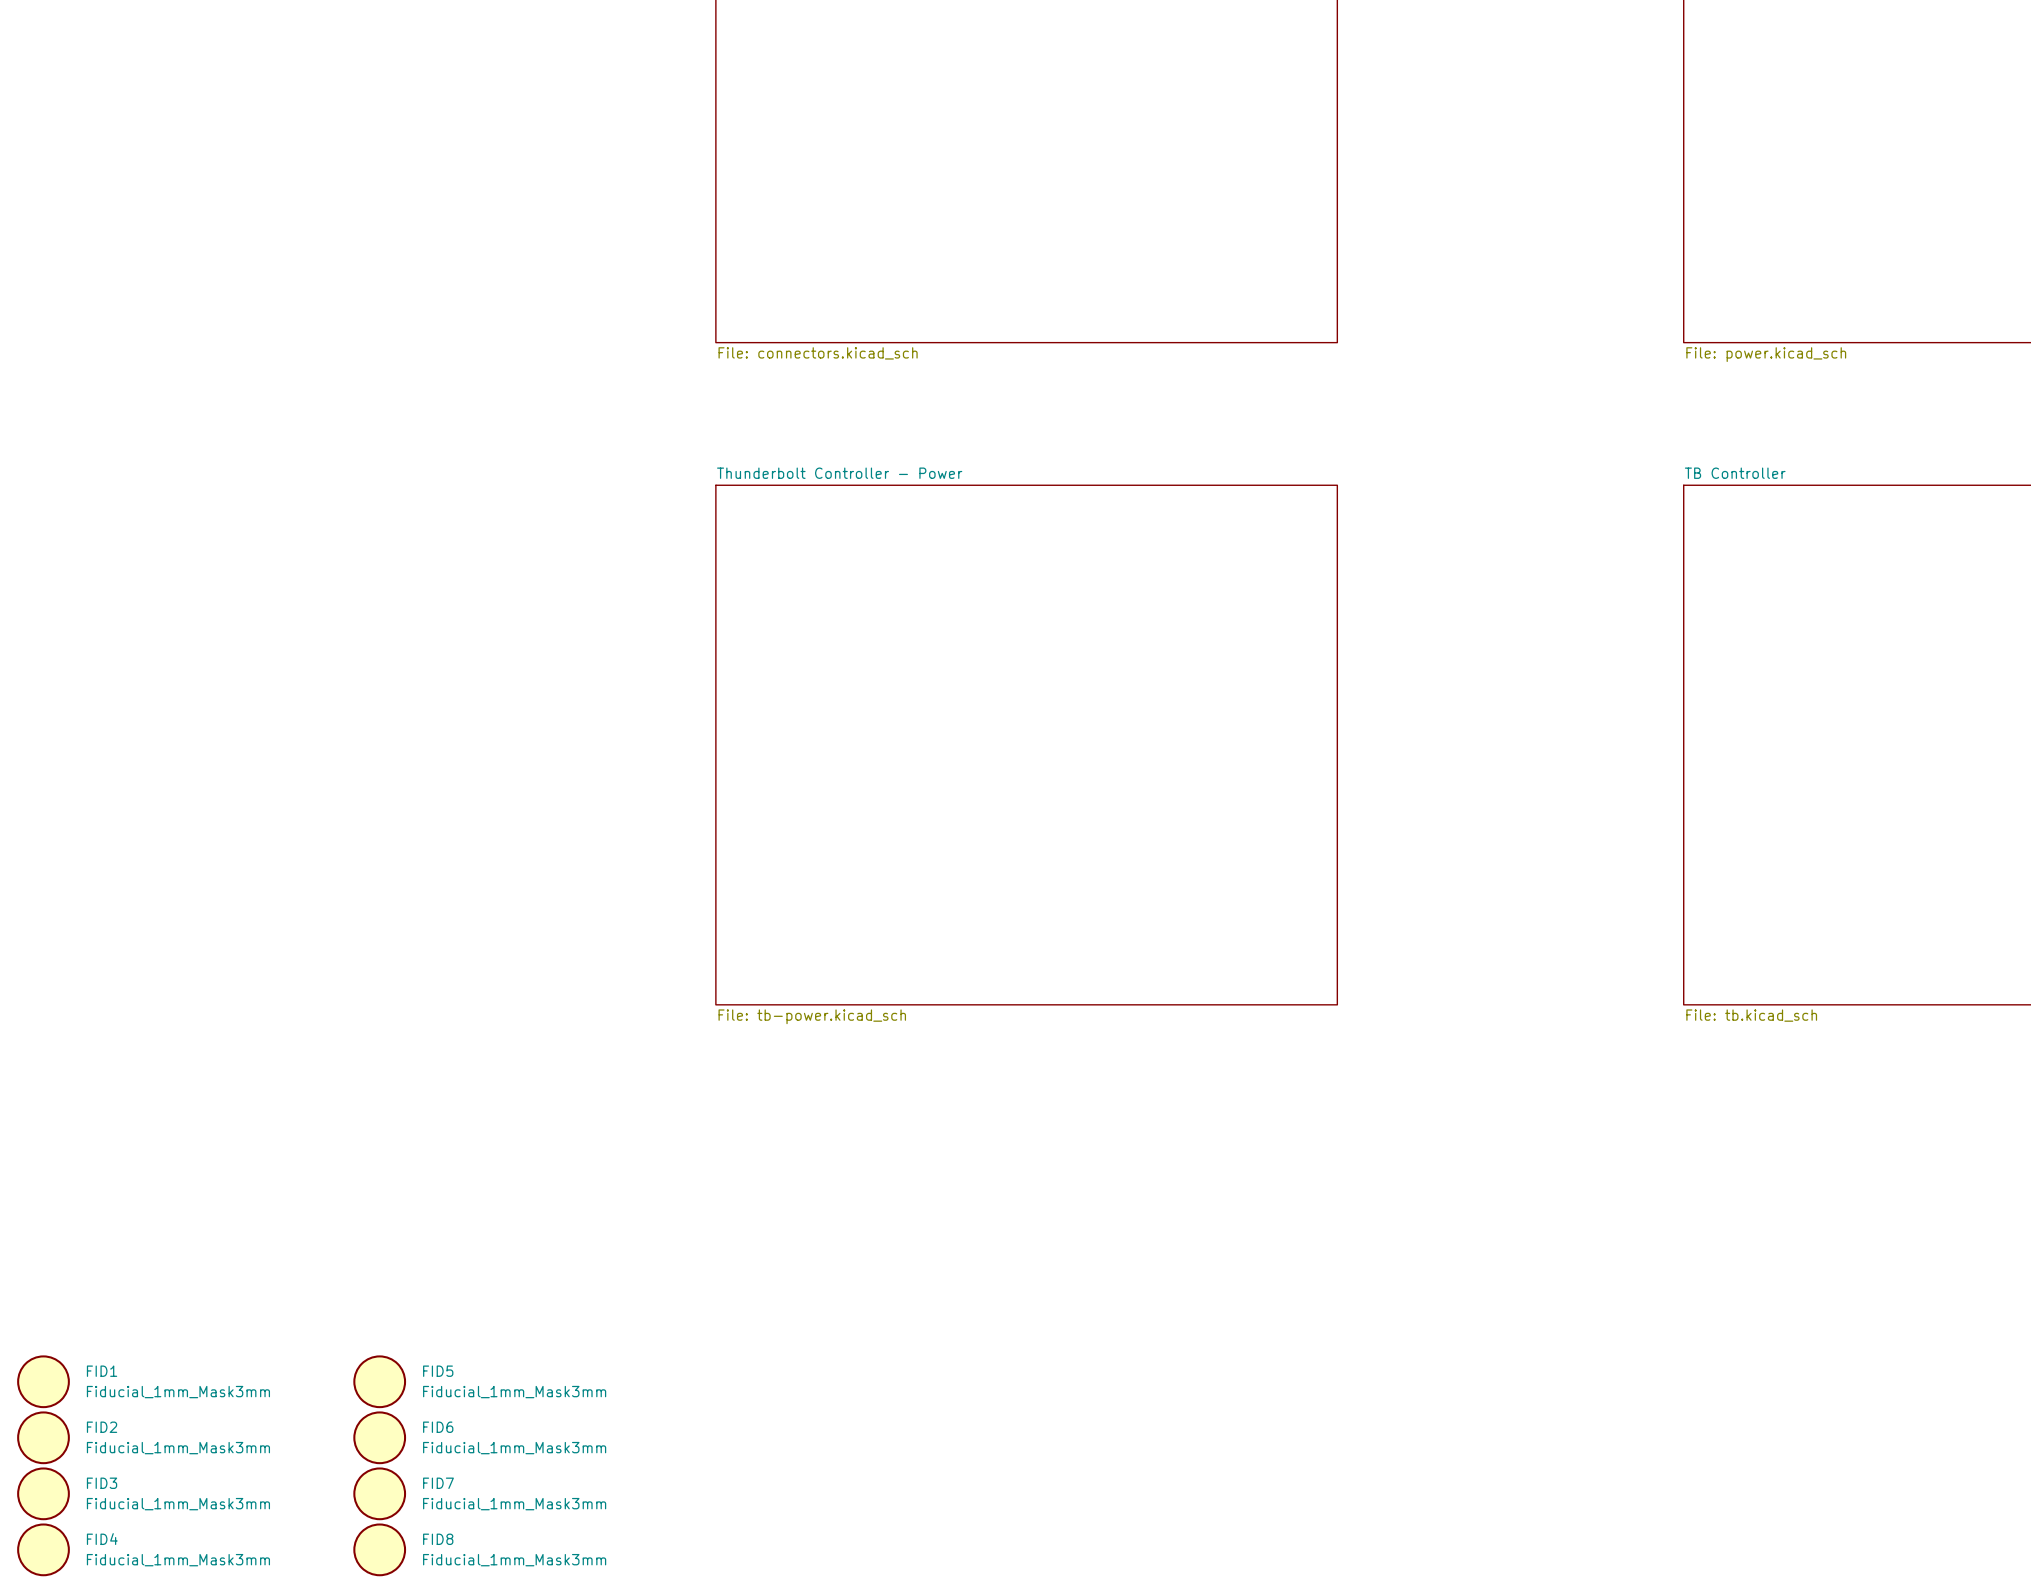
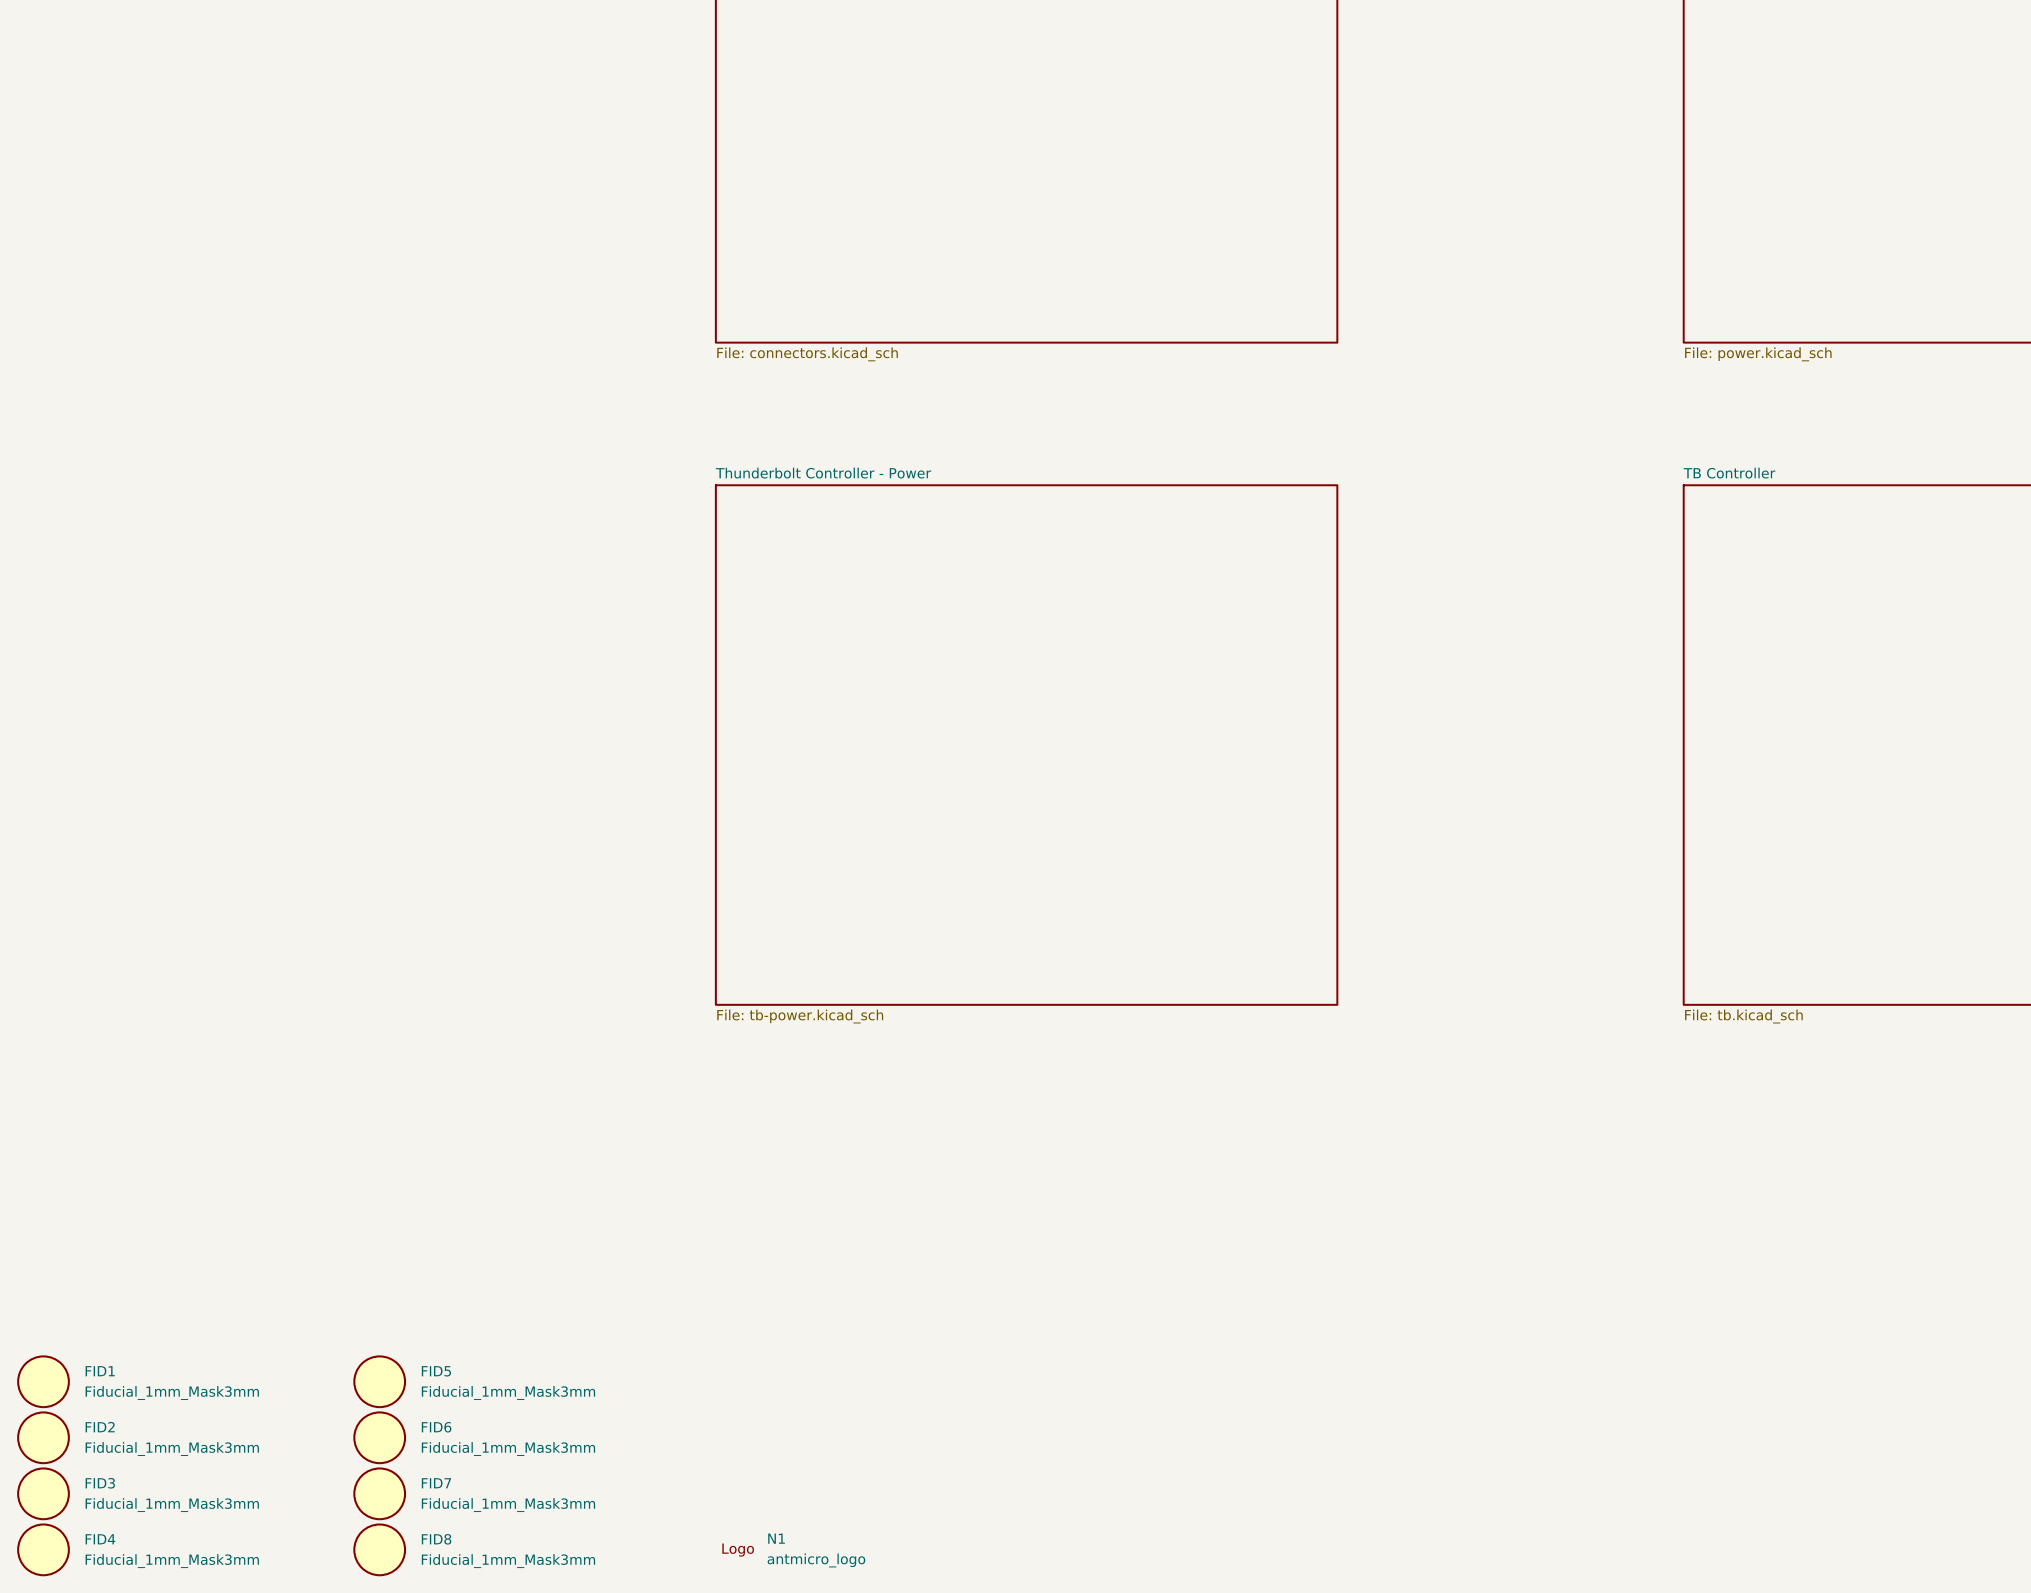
N1: none -> antmicro_logo (793, 1550)

